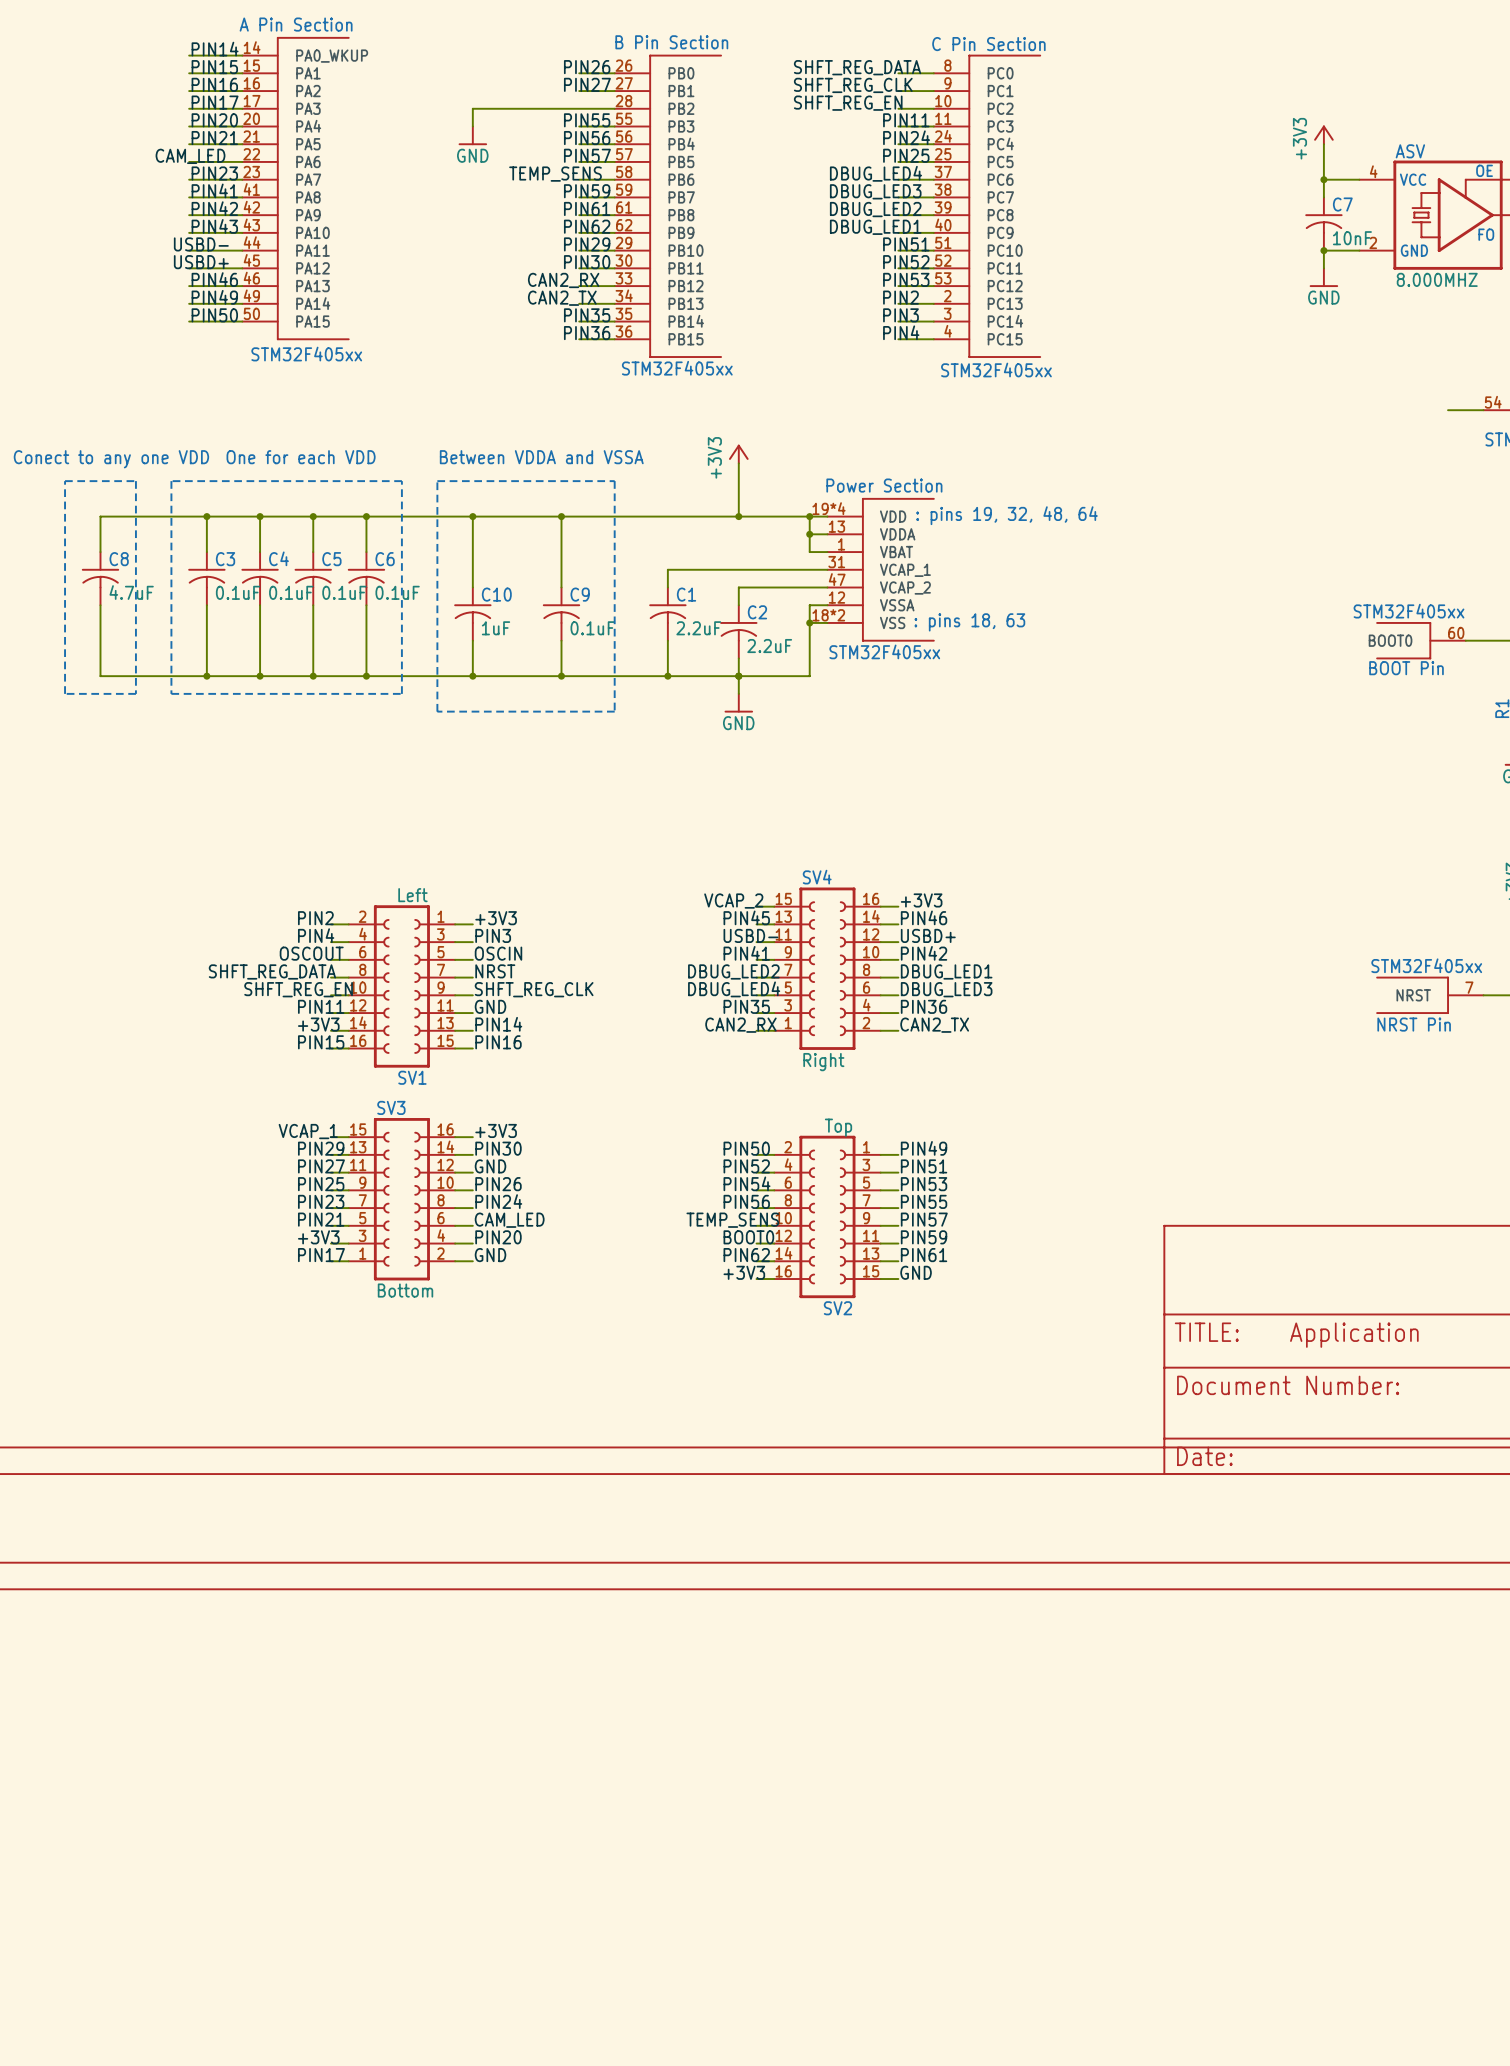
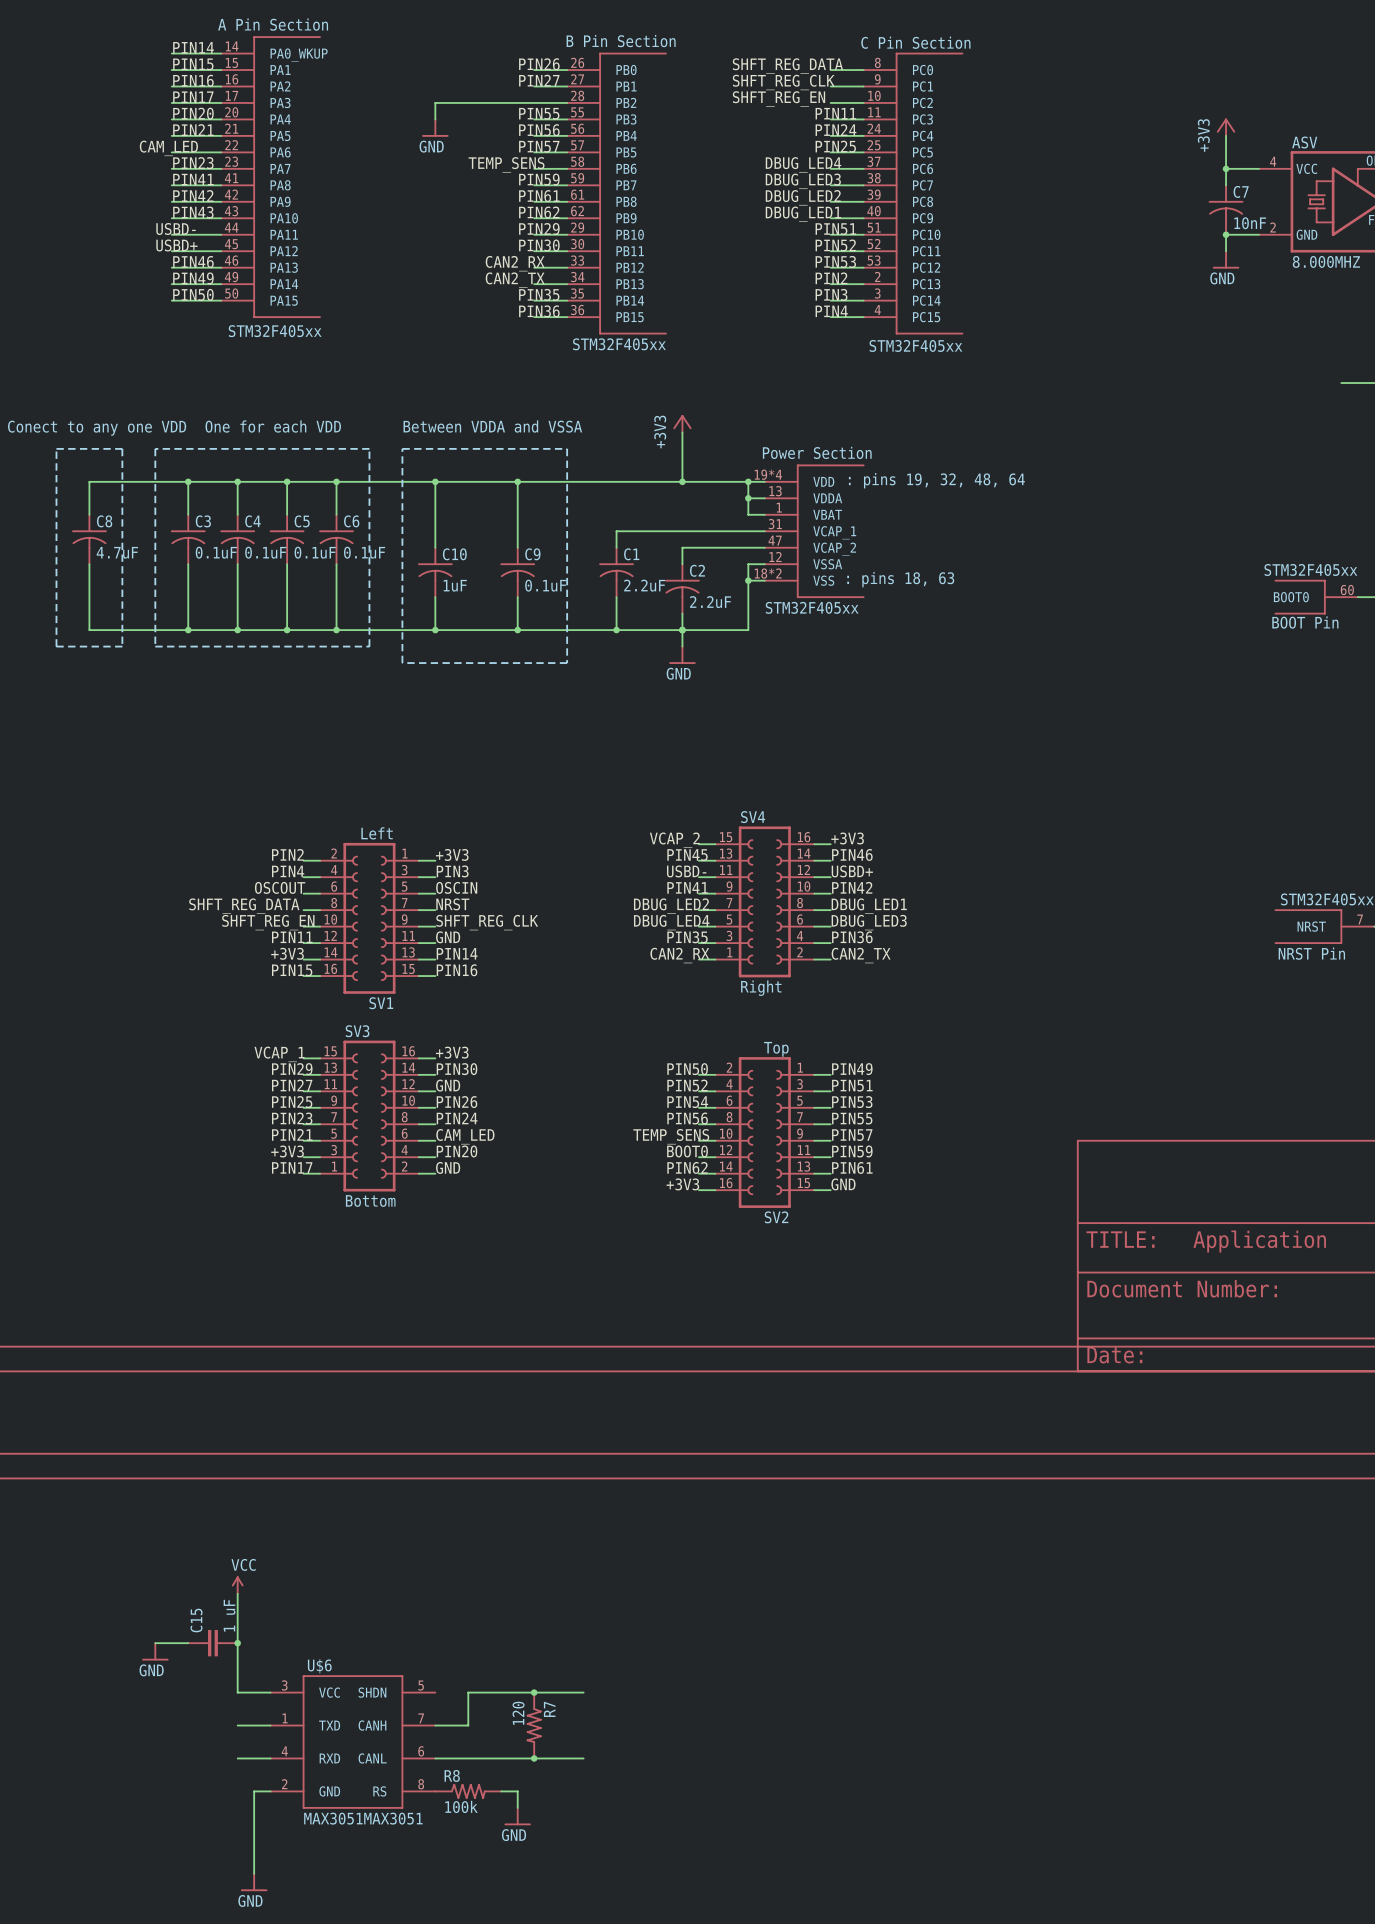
power symbol: none -> VCC (237, 1585)
wire: none -> (237, 1593) (237, 1692) (270, 1692)
wire: none -> (155, 1643) (188, 1643)
C15: none -> 1 uF (212, 1643)
junction: none -> (237, 1643)
power symbol: none -> GND (155, 1651)
junction: none -> (534, 1692)
wire: none -> (583, 1692) (468, 1692) (468, 1725) (435, 1725)
wire: none -> (237, 1725) (270, 1725)
R7: none -> 120 (534, 1725)
U$6: none -> MAX3051MAX3051 (352, 1742)
wire: none -> (237, 1758) (270, 1758)
wire: none -> (435, 1758) (583, 1758)
junction: none -> (534, 1758)
wire: none -> (270, 1791) (254, 1791) (254, 1873)
R8: none -> 100k (468, 1791)
wire: none -> (501, 1791) (517, 1791) (517, 1807)
power symbol: none -> GND (517, 1816)
power symbol: none -> GND (254, 1882)

